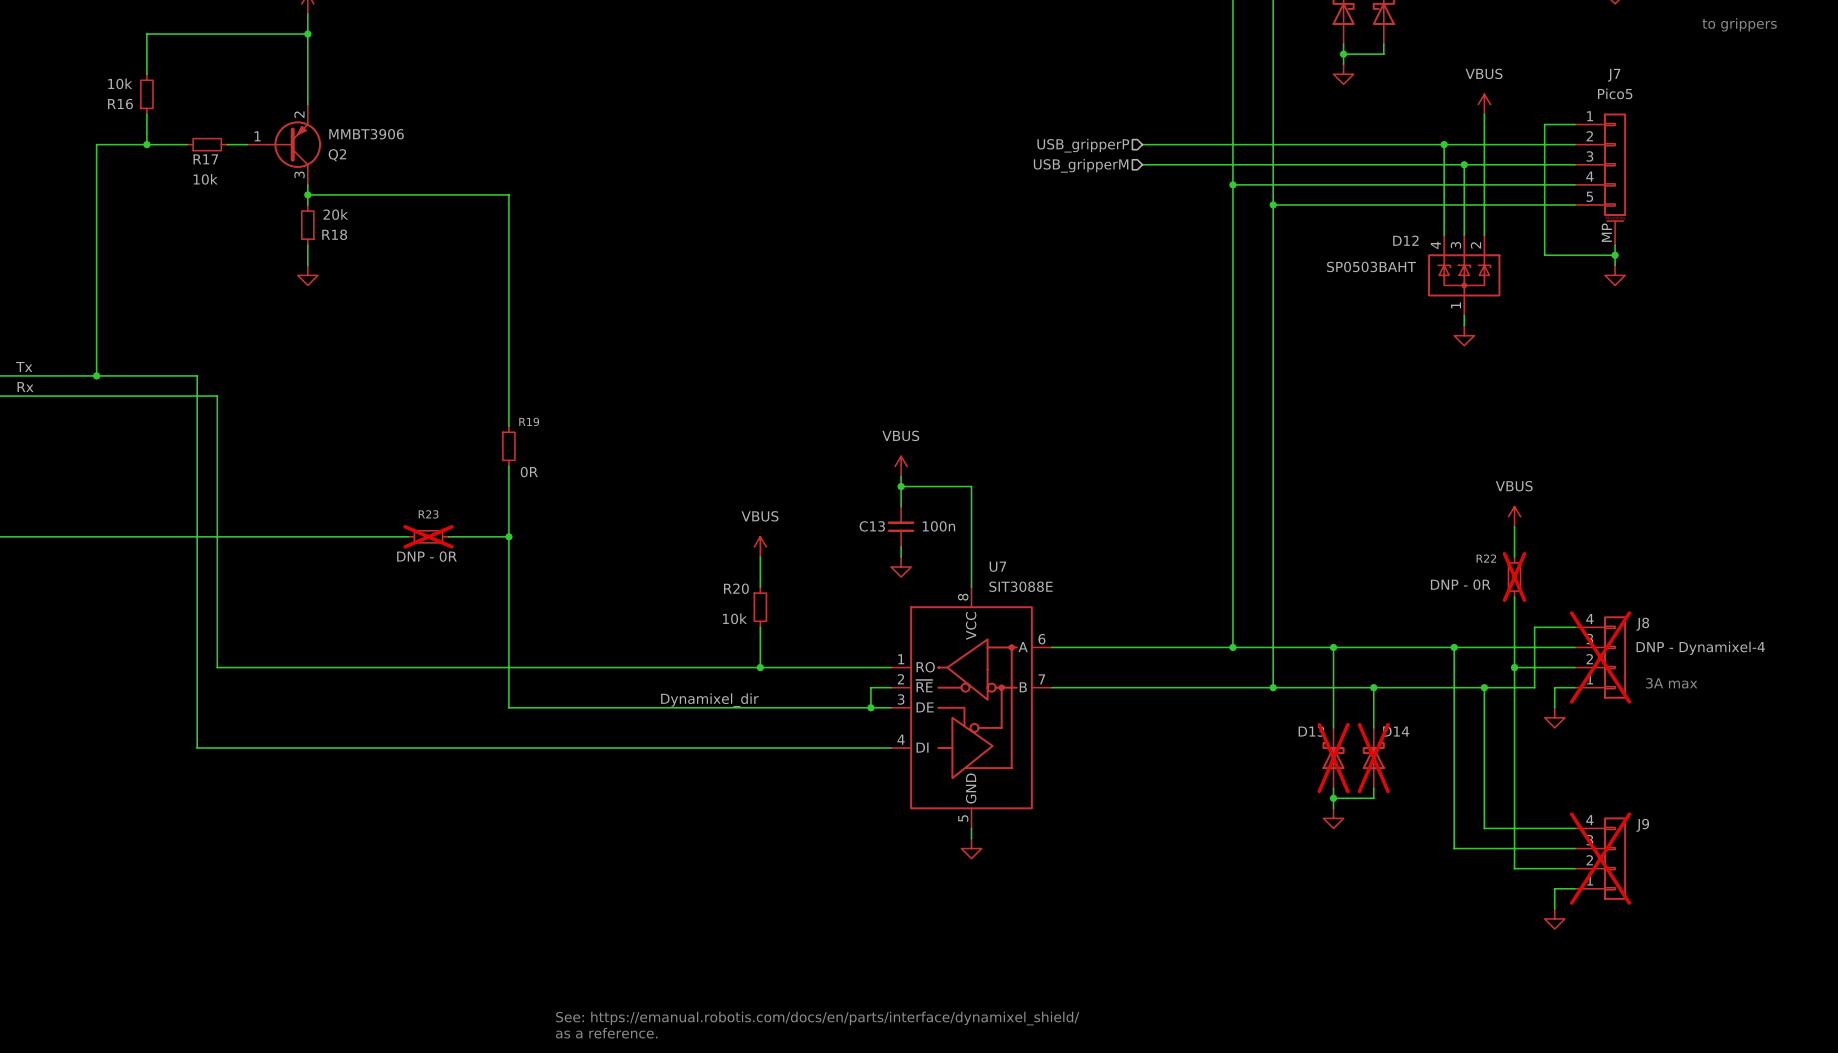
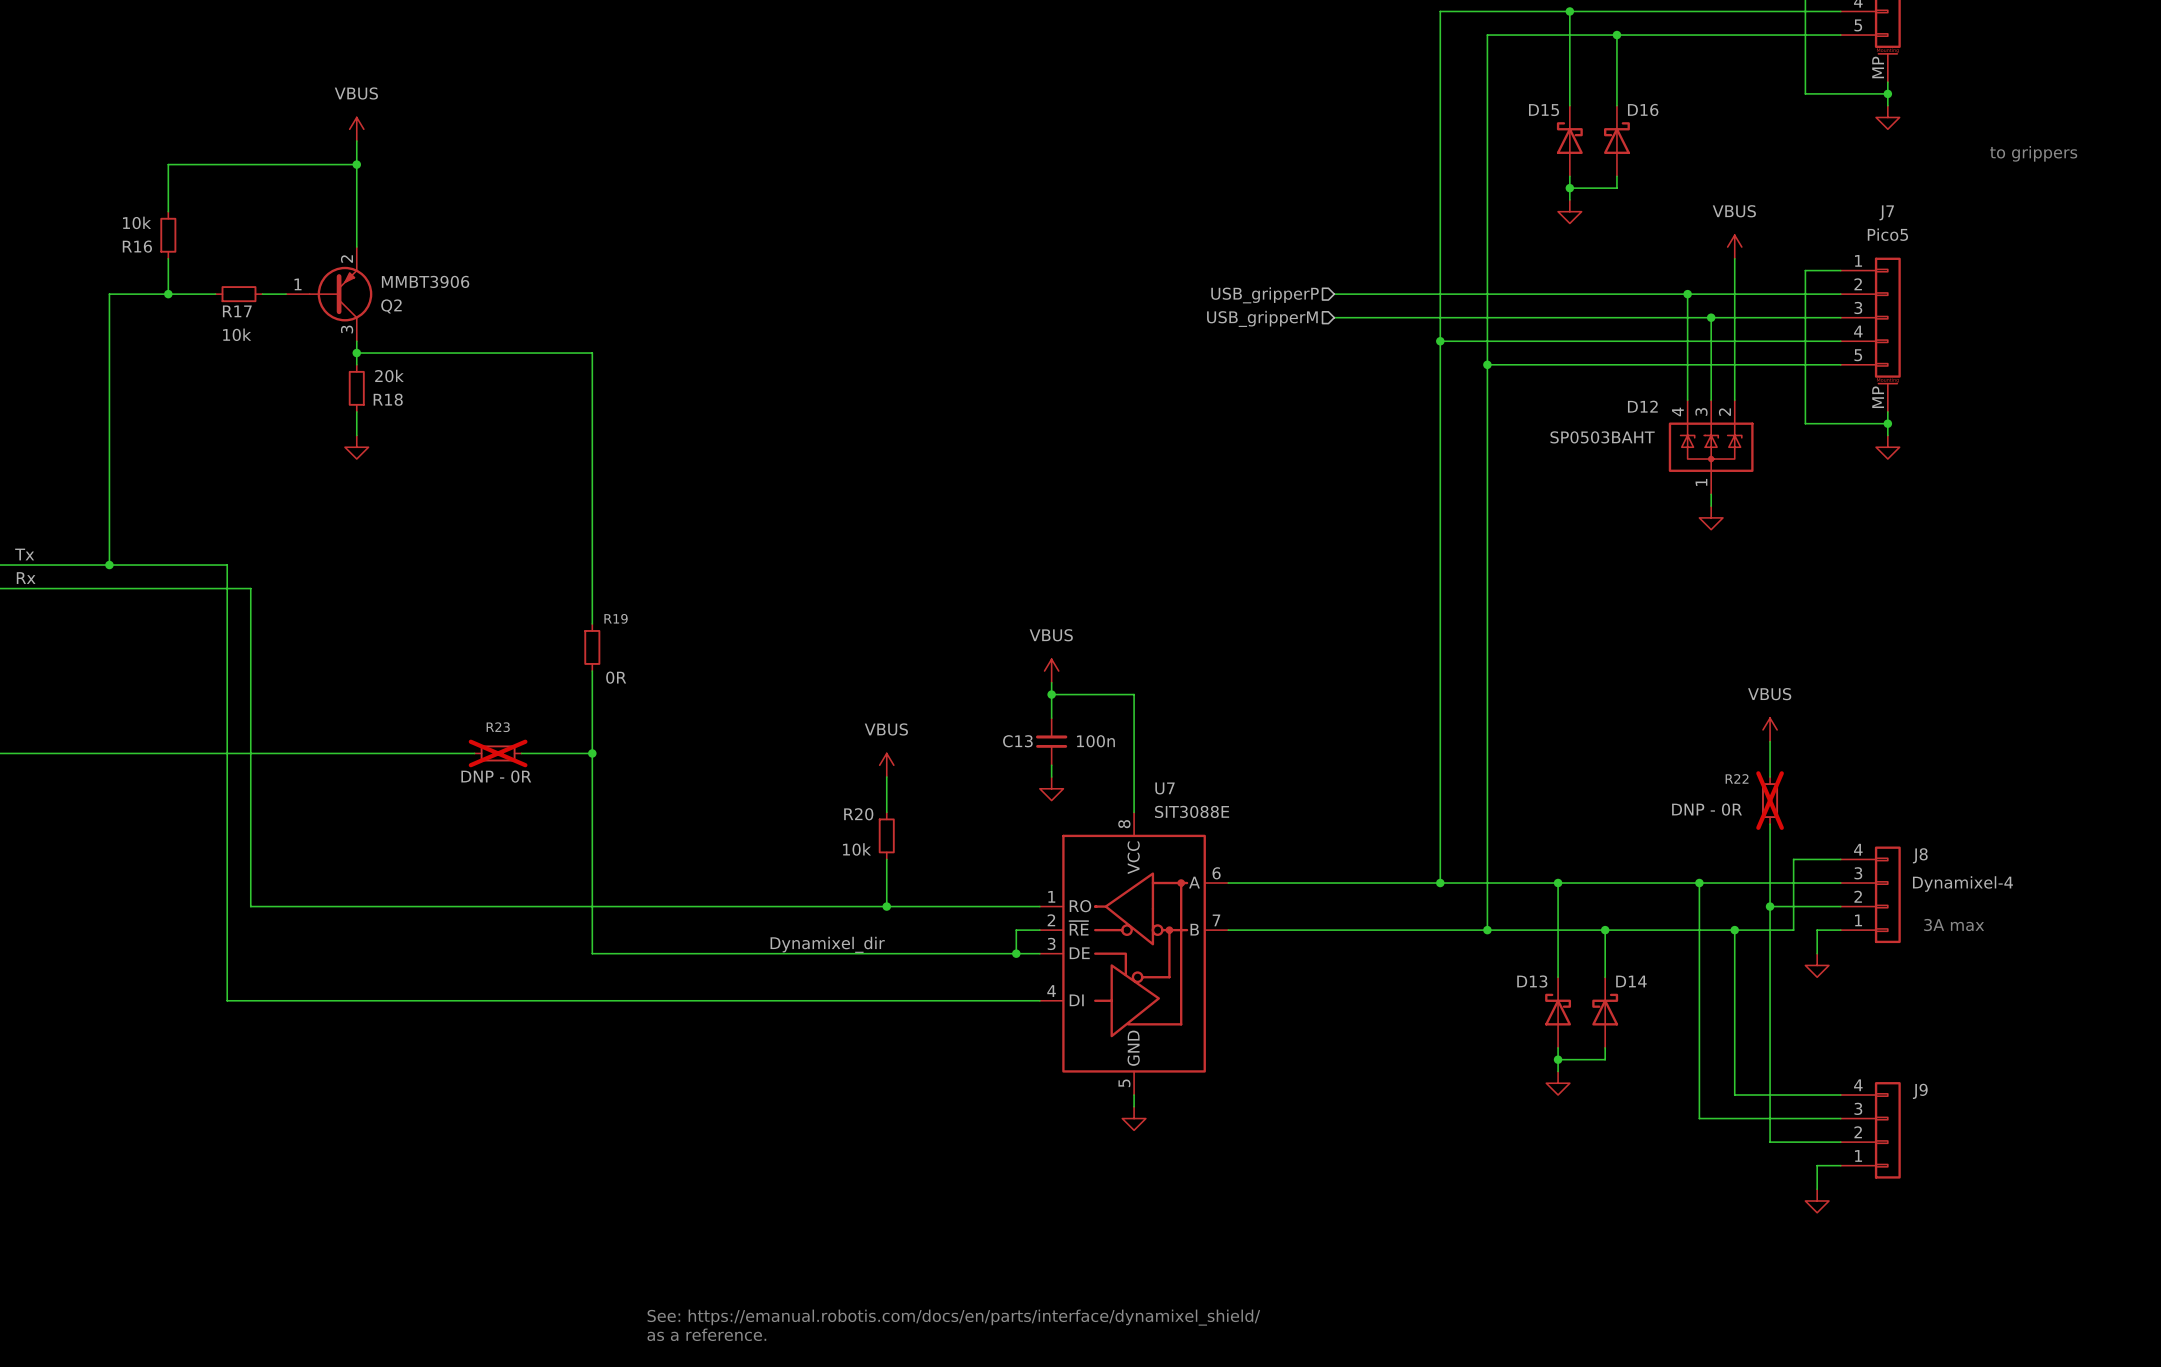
J8 value: DNP - Dynamixel-4 (1700, 648) -> Dynamixel-4 (1962, 884)
J8 do-not-place cross: (1600, 657) -> none
D13 do-not-place cross: (1333, 758) -> none
D14 do-not-place cross: (1373, 758) -> none
J9 do-not-place cross: (1600, 858) -> none

